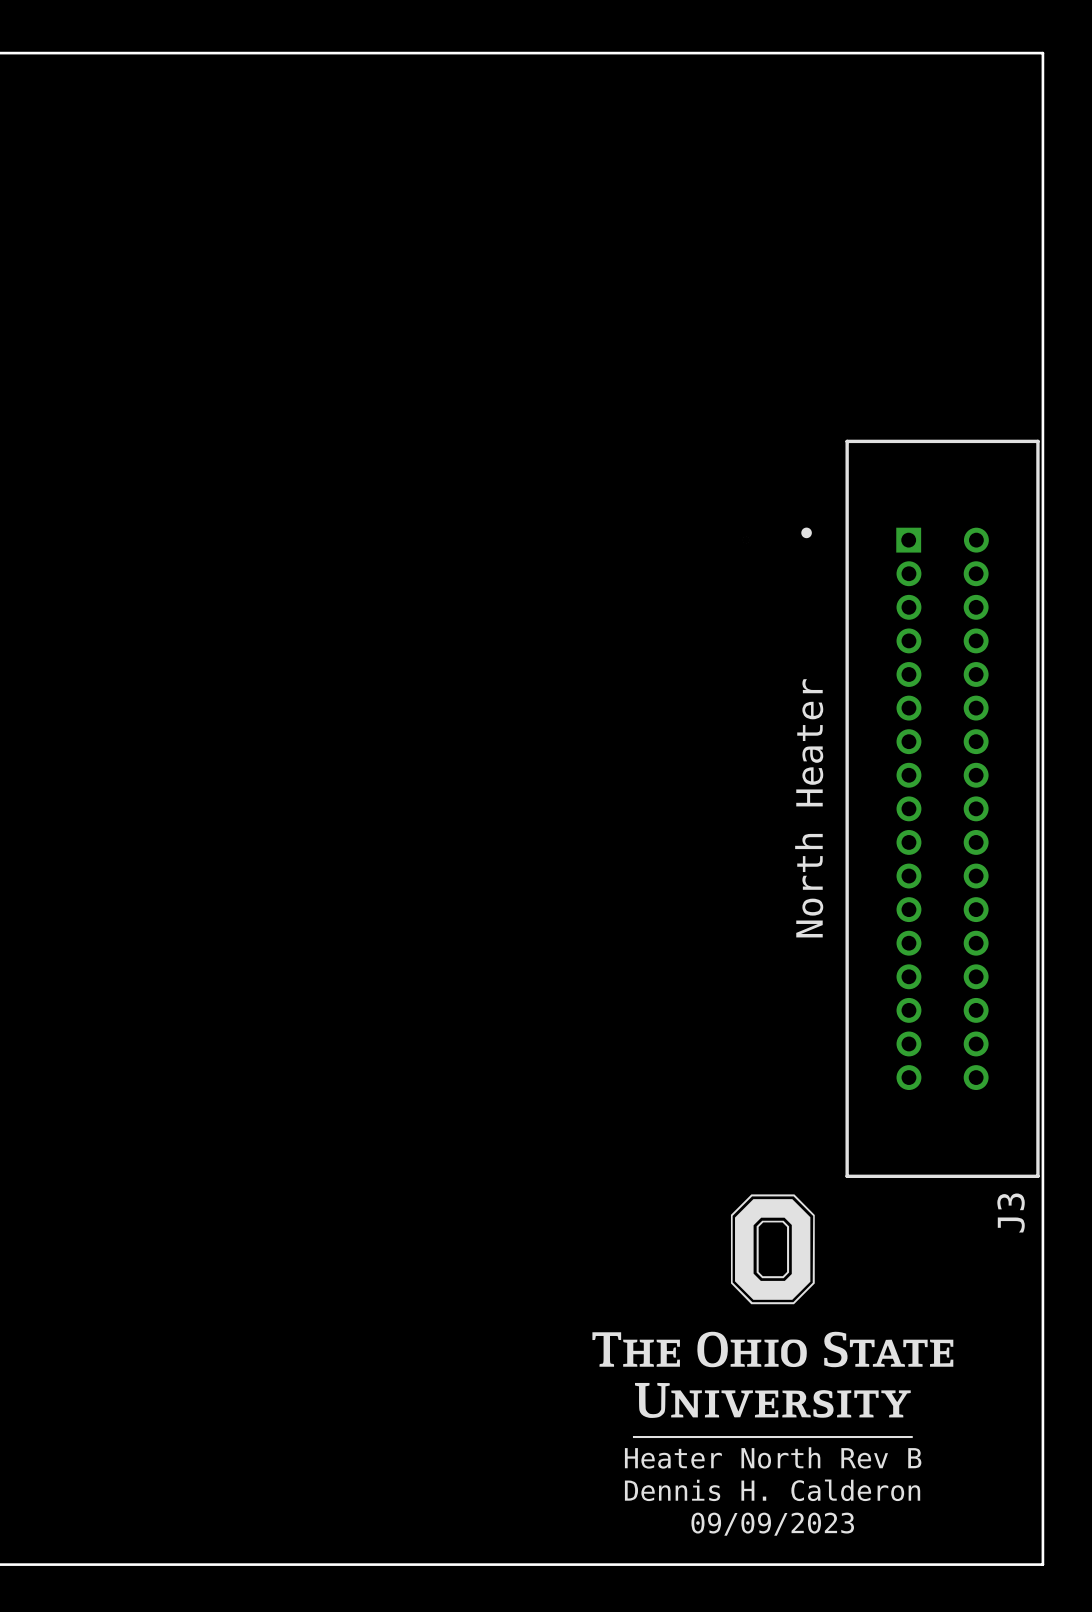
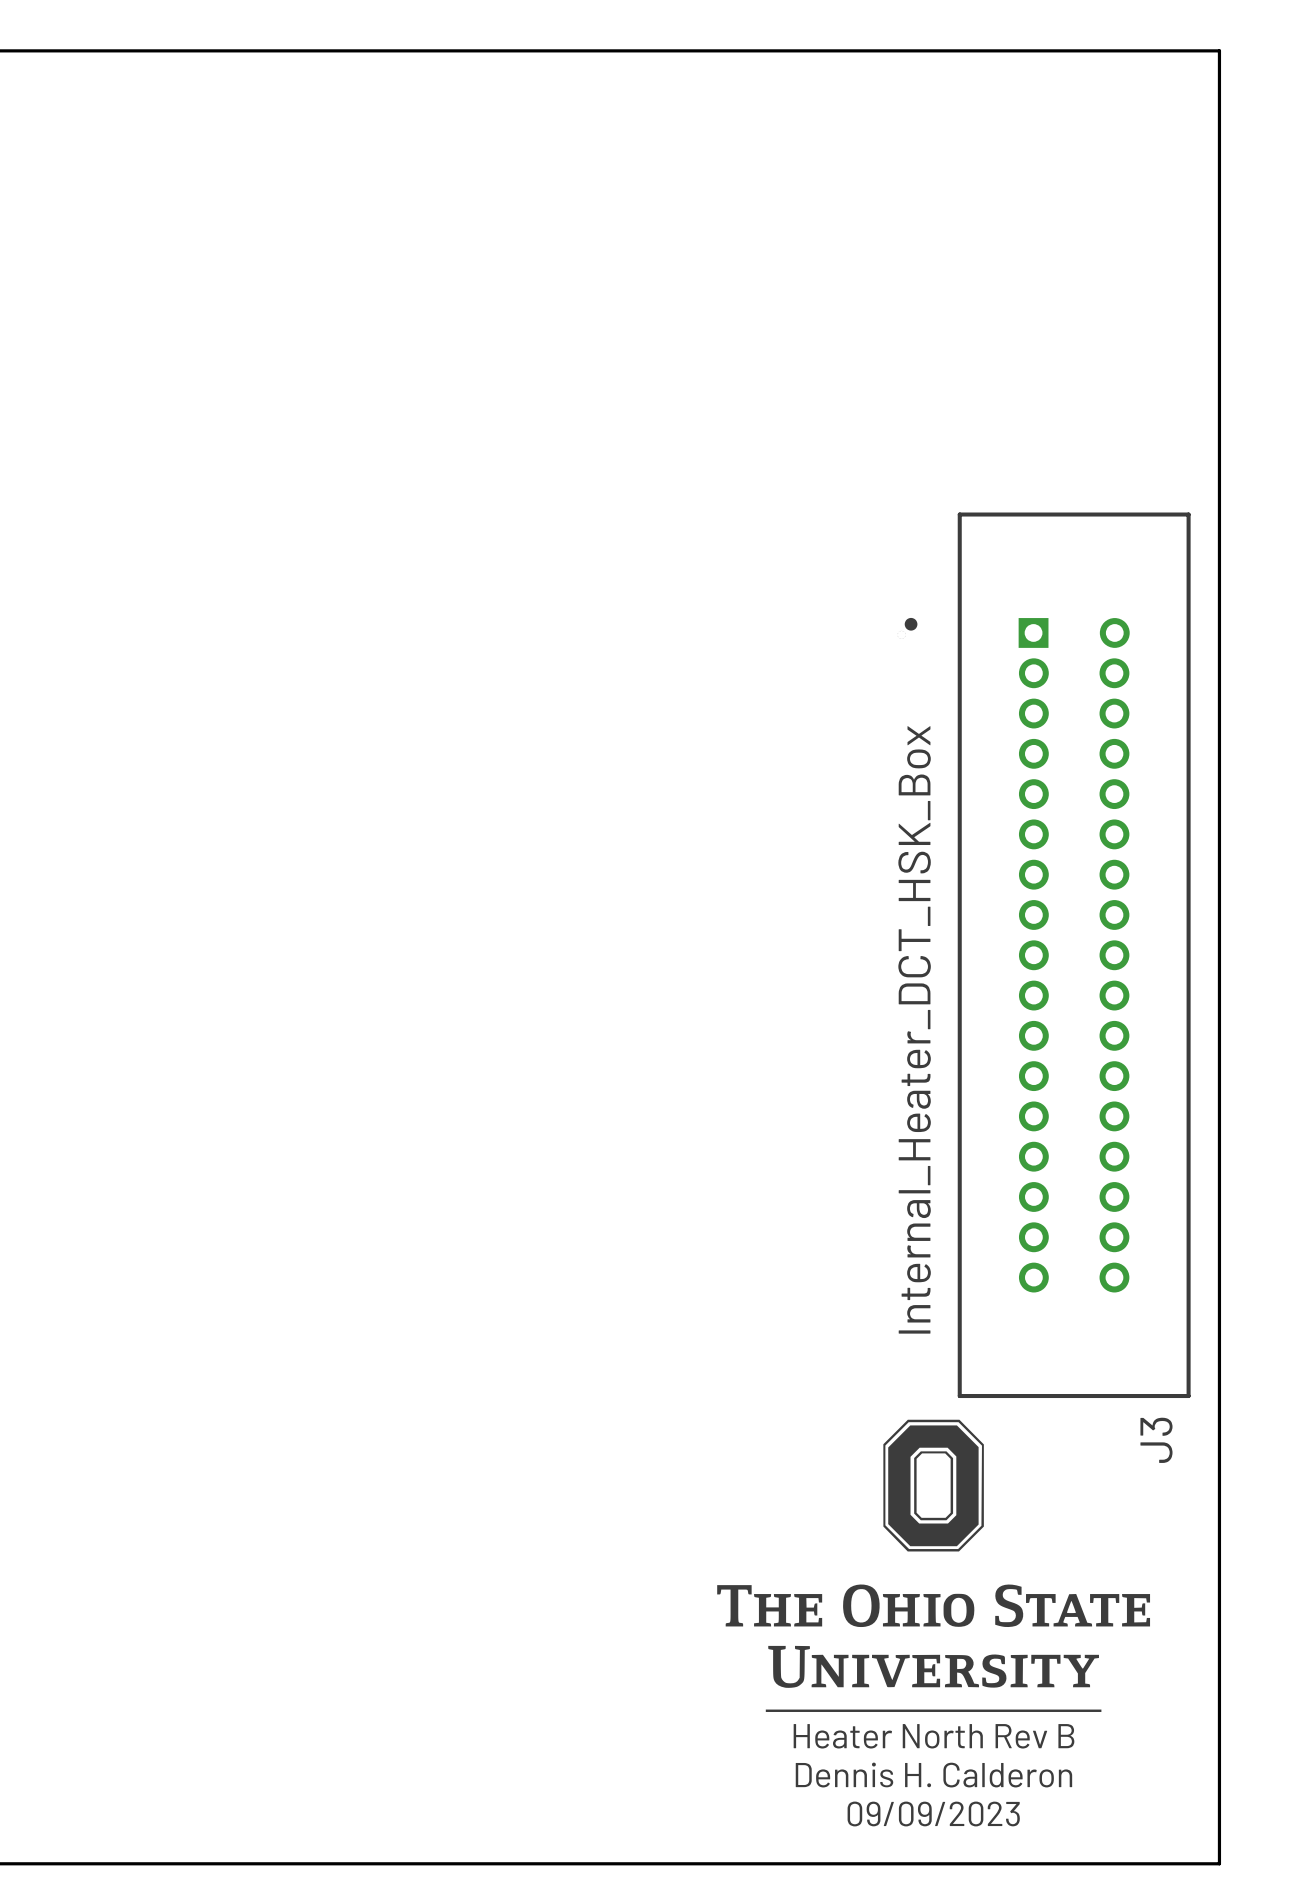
board edge: (1011, 53) (1042, 53) (1042, 1564) (1011, 1564) -> (1219, 50) (1219, 1863)
J3 value: North Heater (809, 808) -> Internal_Heater_DCT_HSK_Box (914, 1029)
J3 position: (920, 808) -> (1047, 955)

